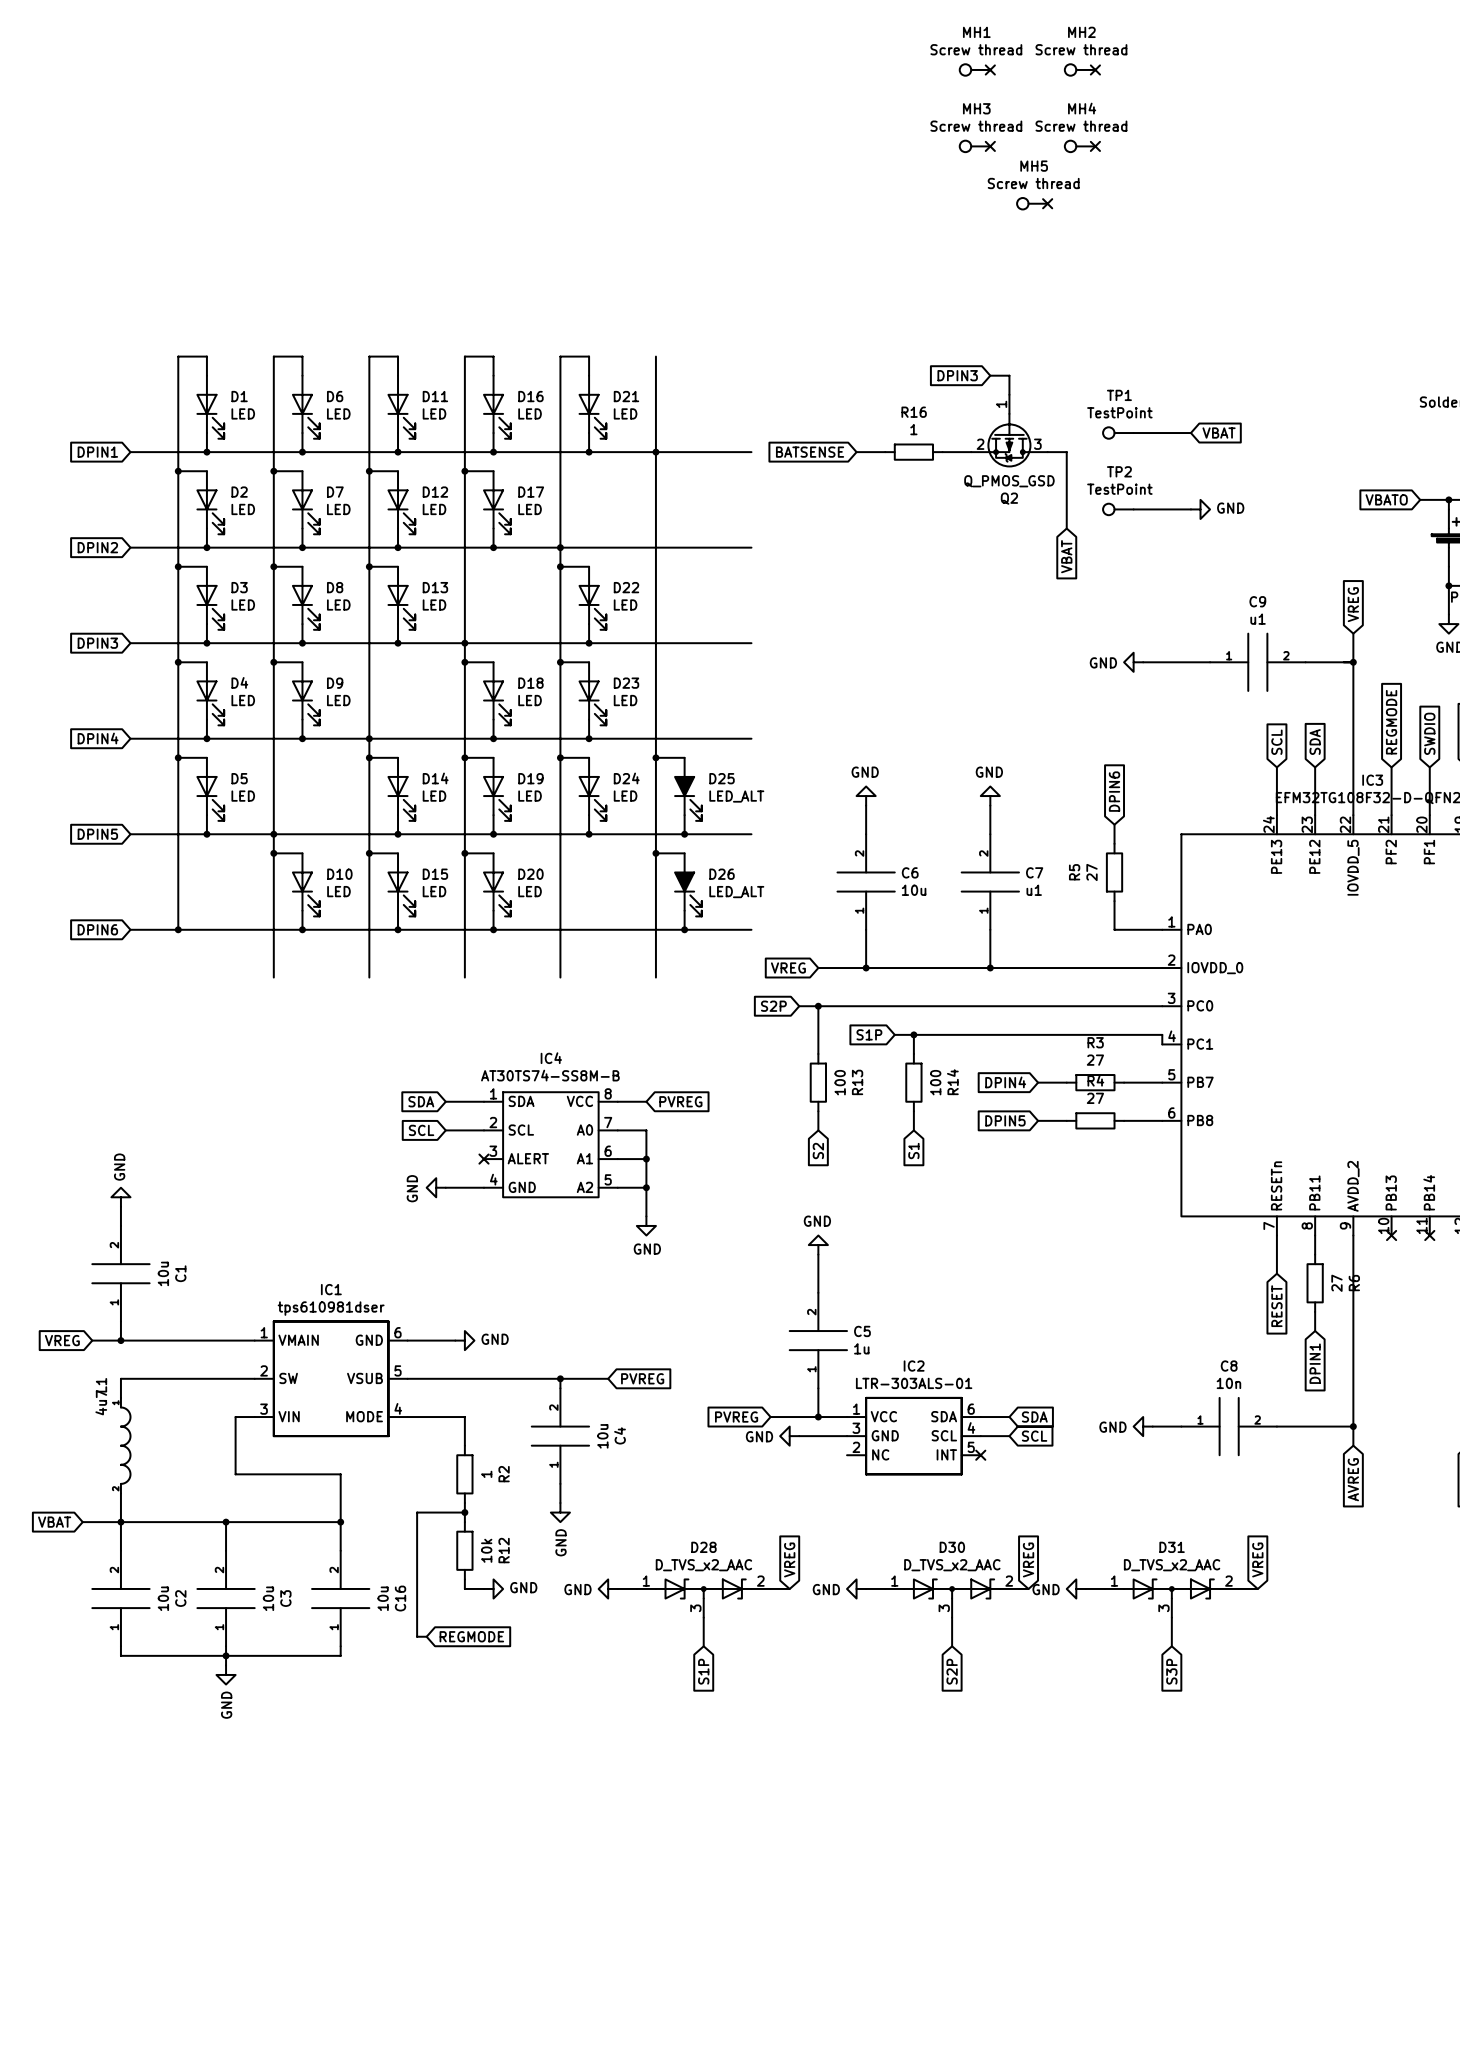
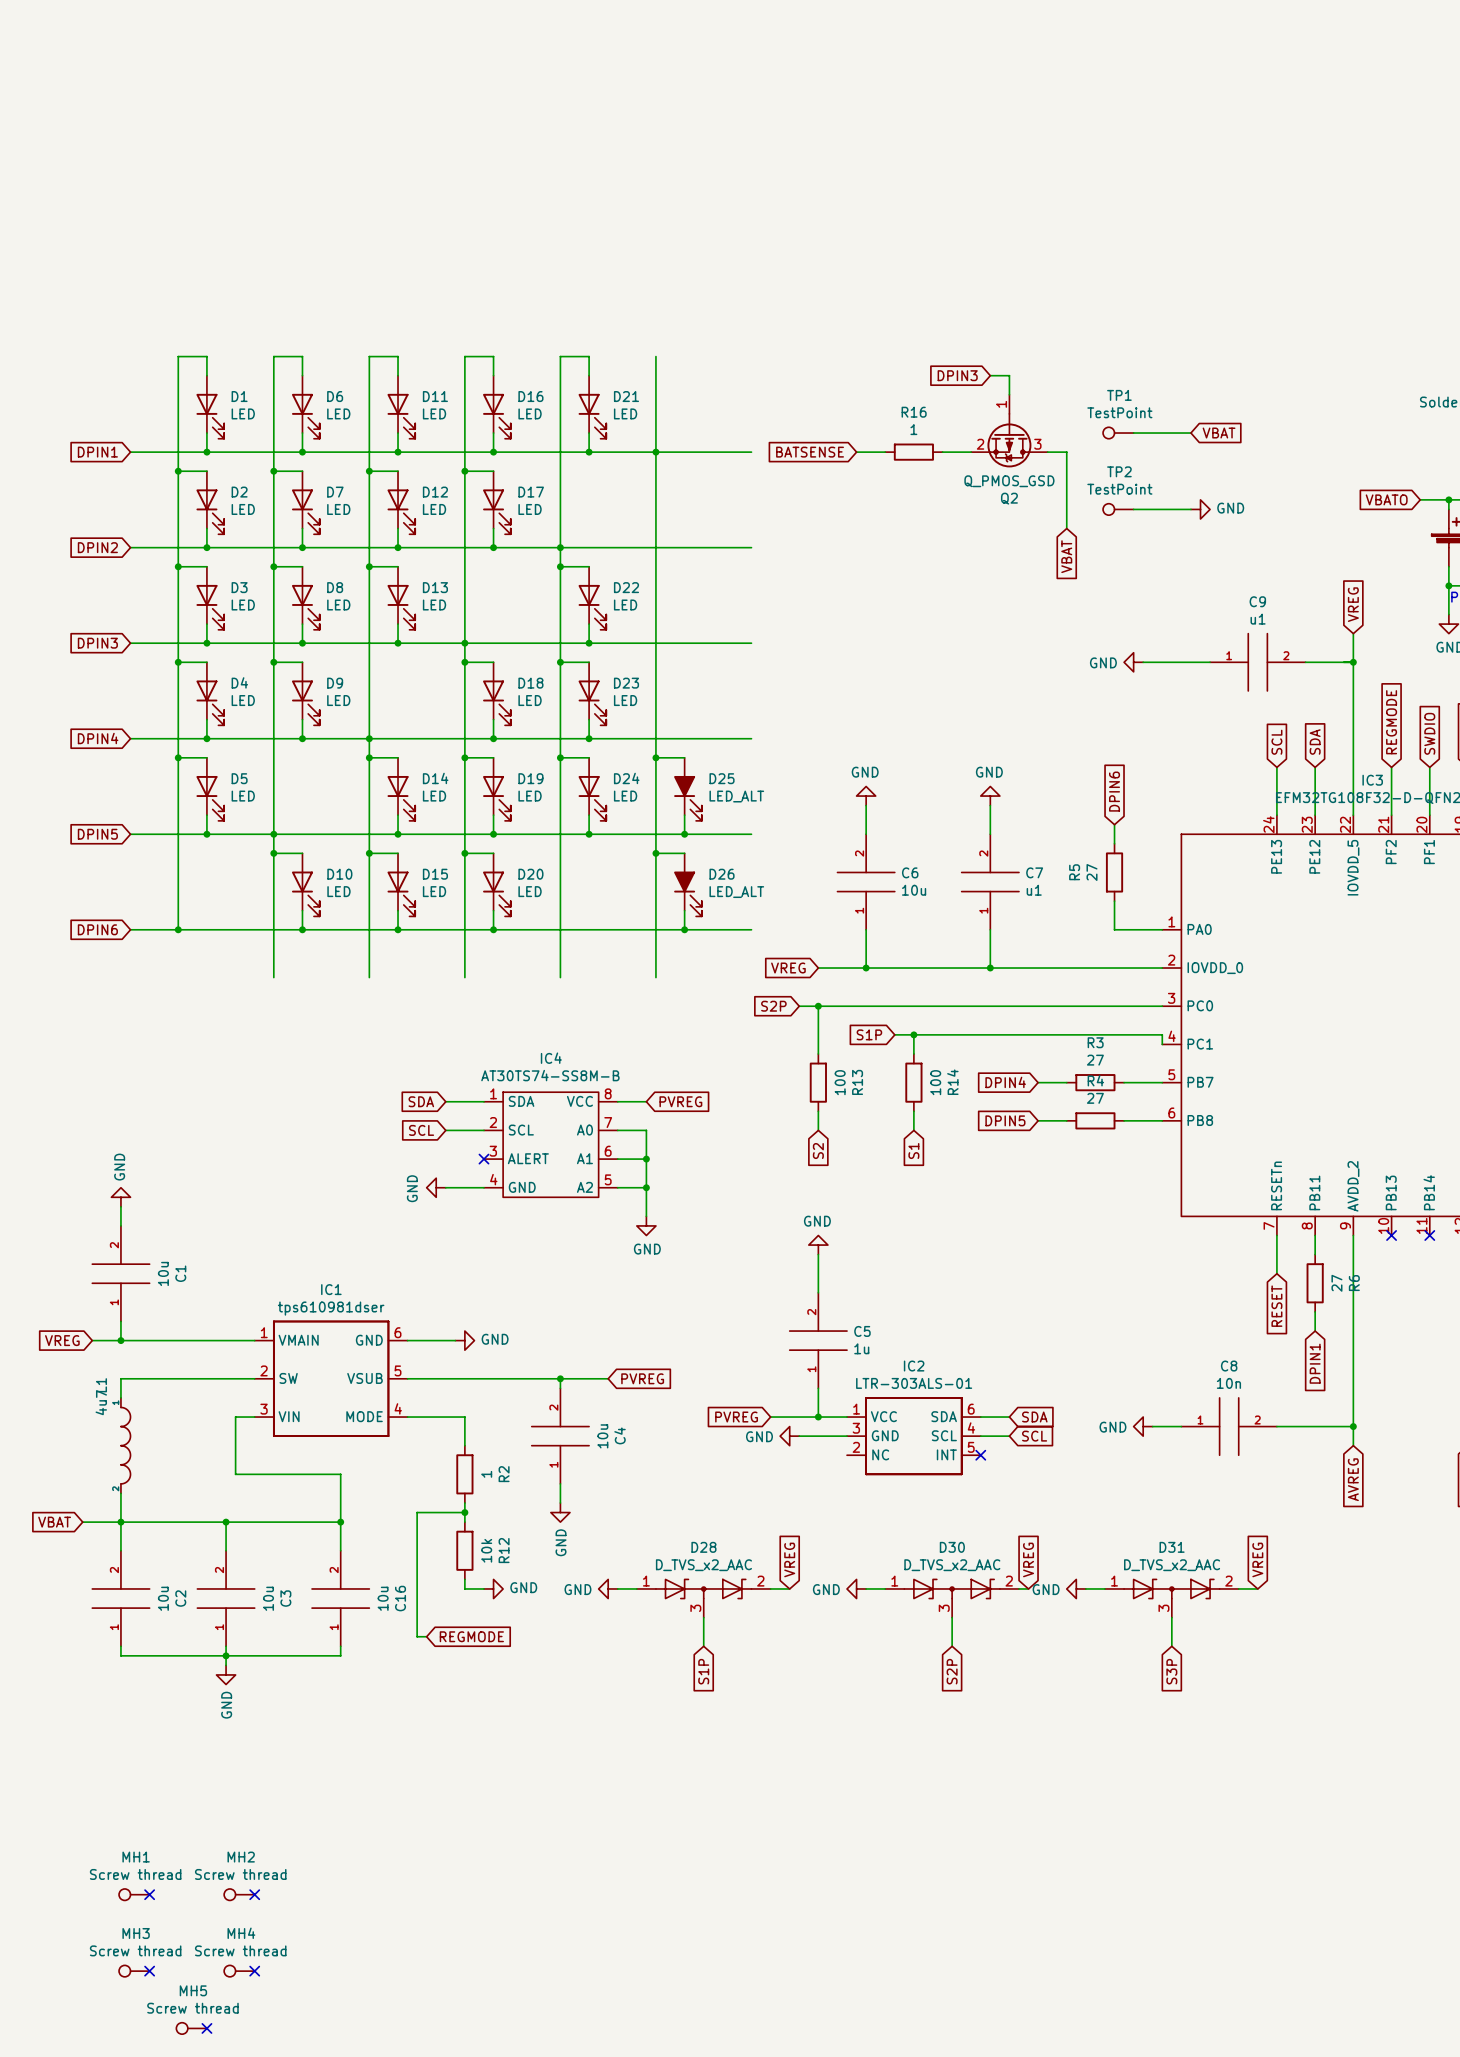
MH1 position: (975, 69) -> (134, 1894)
no-connect mark: (990, 69) -> none
MH2 position: (1080, 69) -> (239, 1894)
no-connect mark: (1095, 69) -> none
MH3 position: (975, 146) -> (134, 1971)
no-connect mark: (990, 146) -> none
MH4 position: (1080, 146) -> (239, 1971)
no-connect mark: (1095, 146) -> none
MH5 position: (1032, 203) -> (191, 2028)
no-connect mark: (1047, 203) -> none
no-connect mark: none -> (149, 1894)
no-connect mark: none -> (254, 1894)
no-connect mark: none -> (149, 1971)
no-connect mark: none -> (254, 1971)
no-connect mark: none -> (206, 2028)

